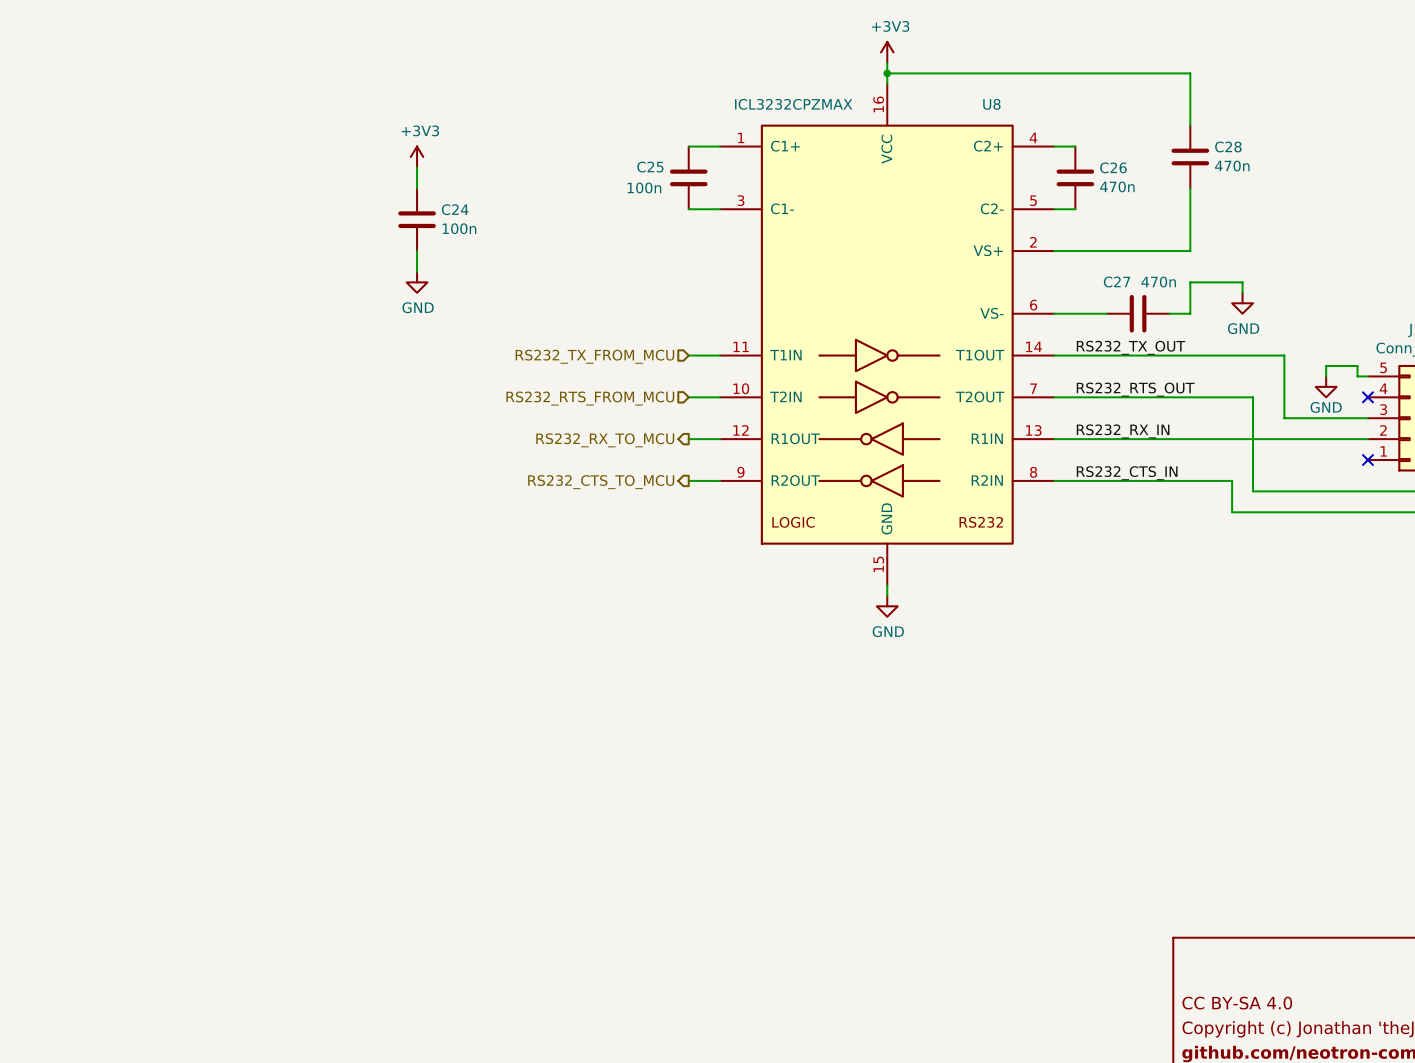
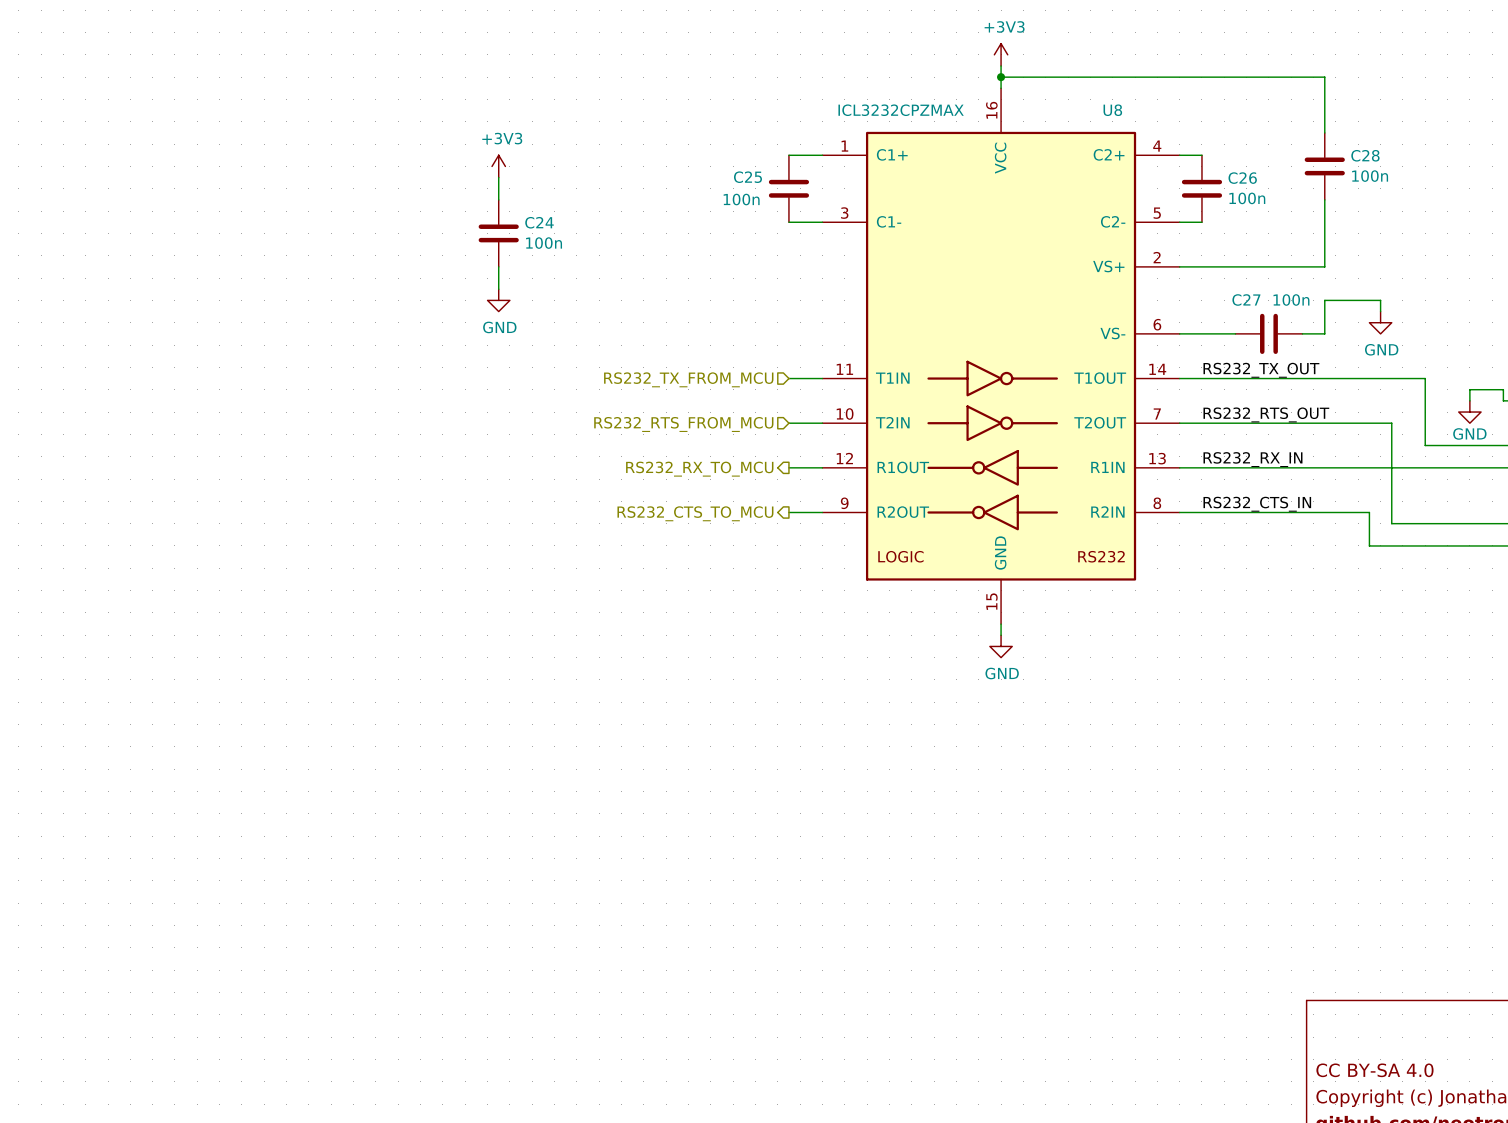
C28 value: 470n (1232, 166) -> 100n (1370, 176)
C26 value: 470n (1117, 186) -> 100n (1247, 198)
C27 value: 470n (1158, 282) -> 100n (1291, 299)

